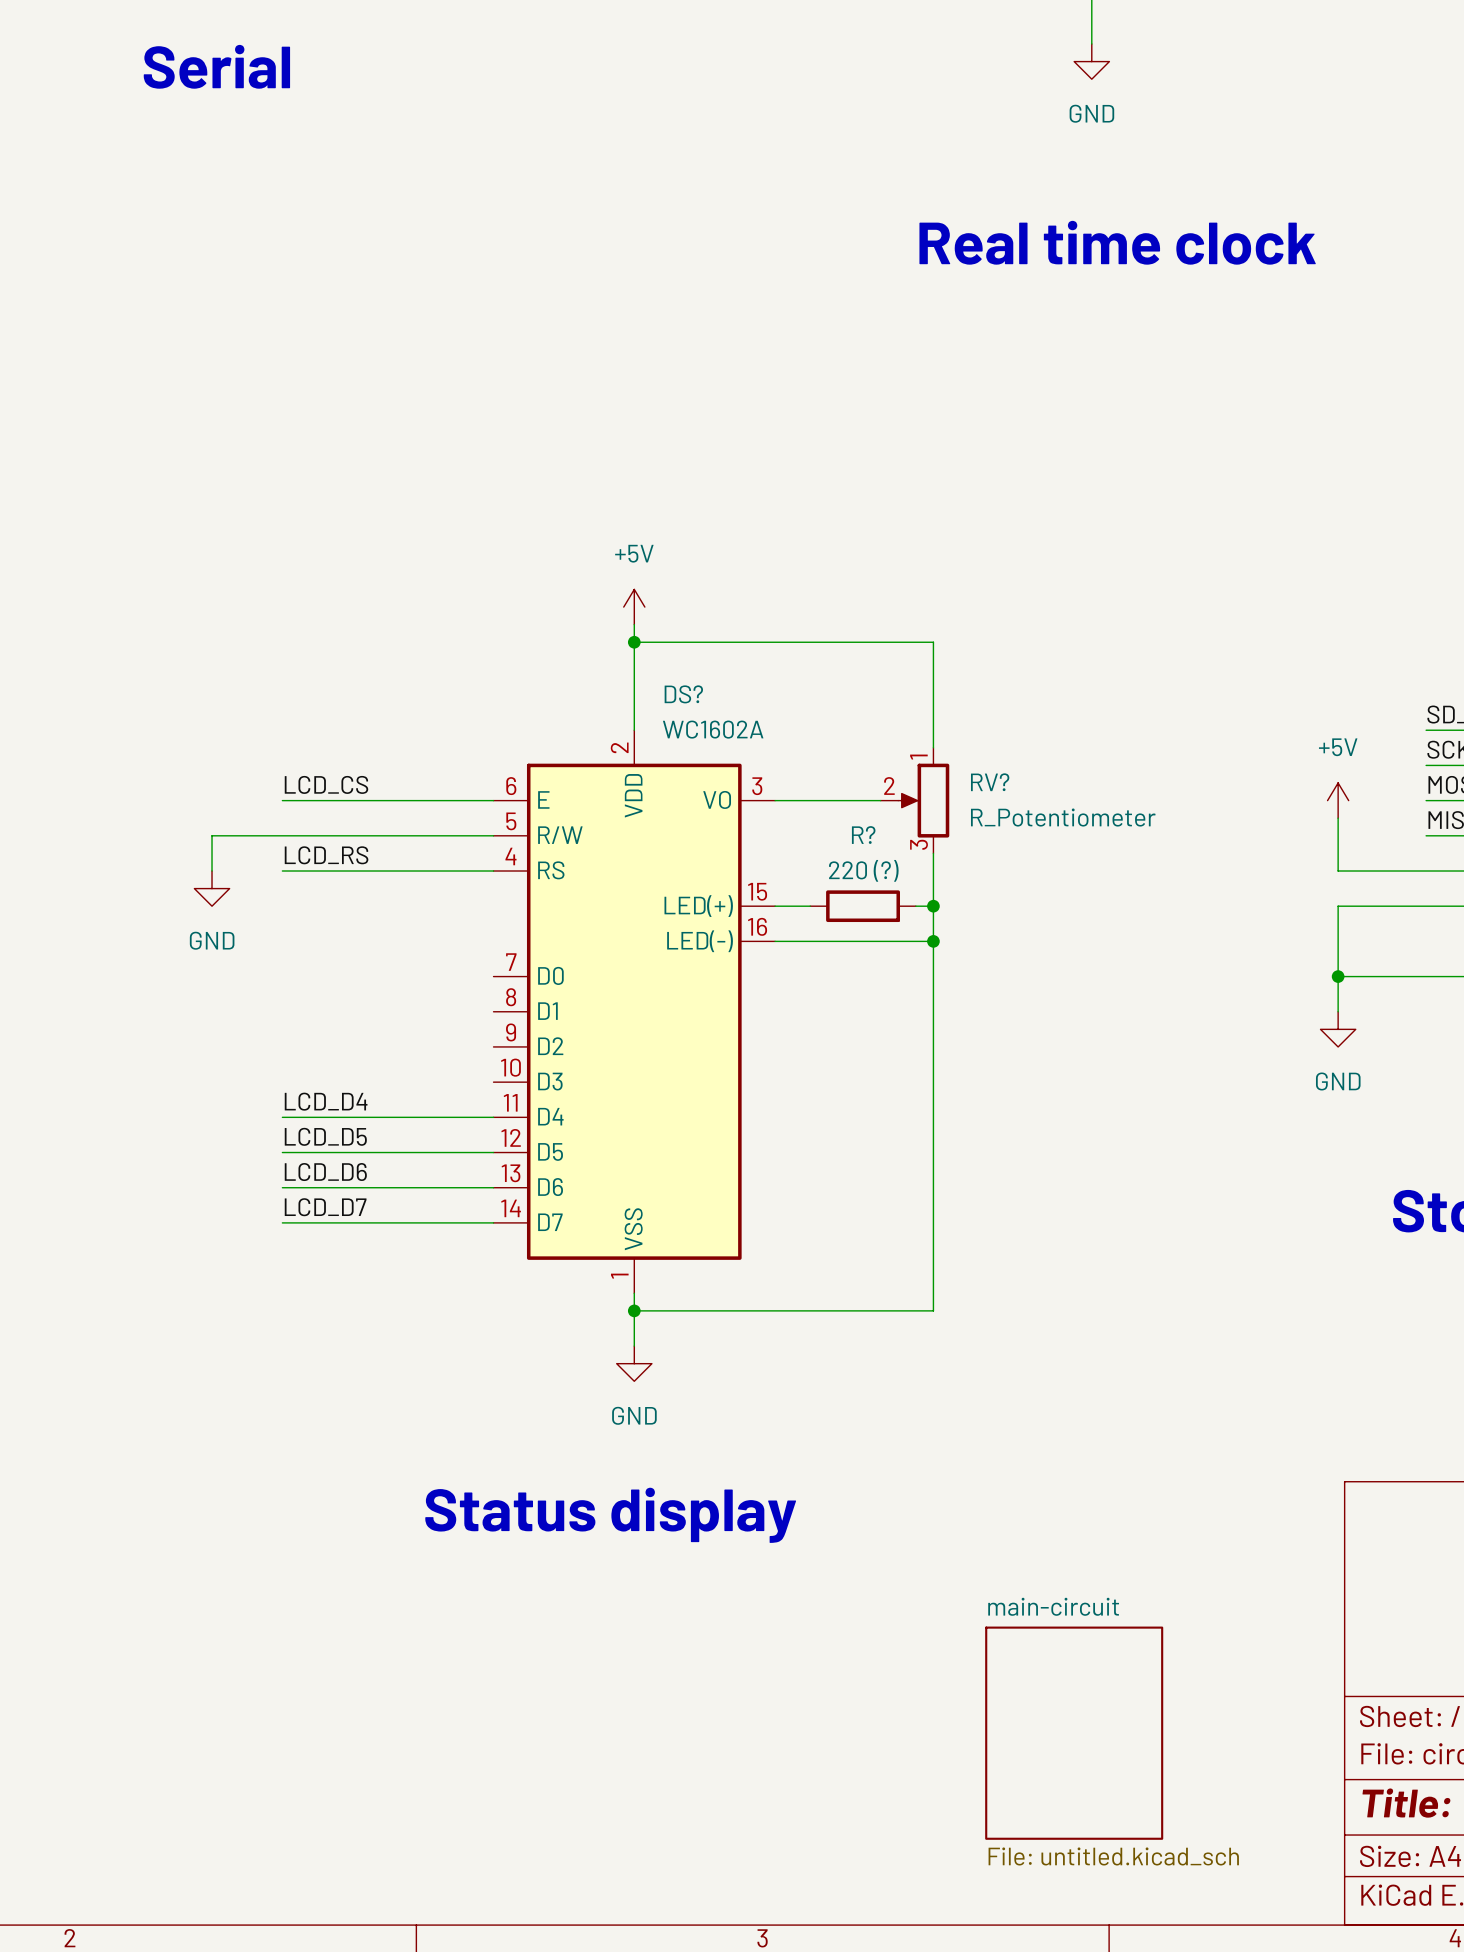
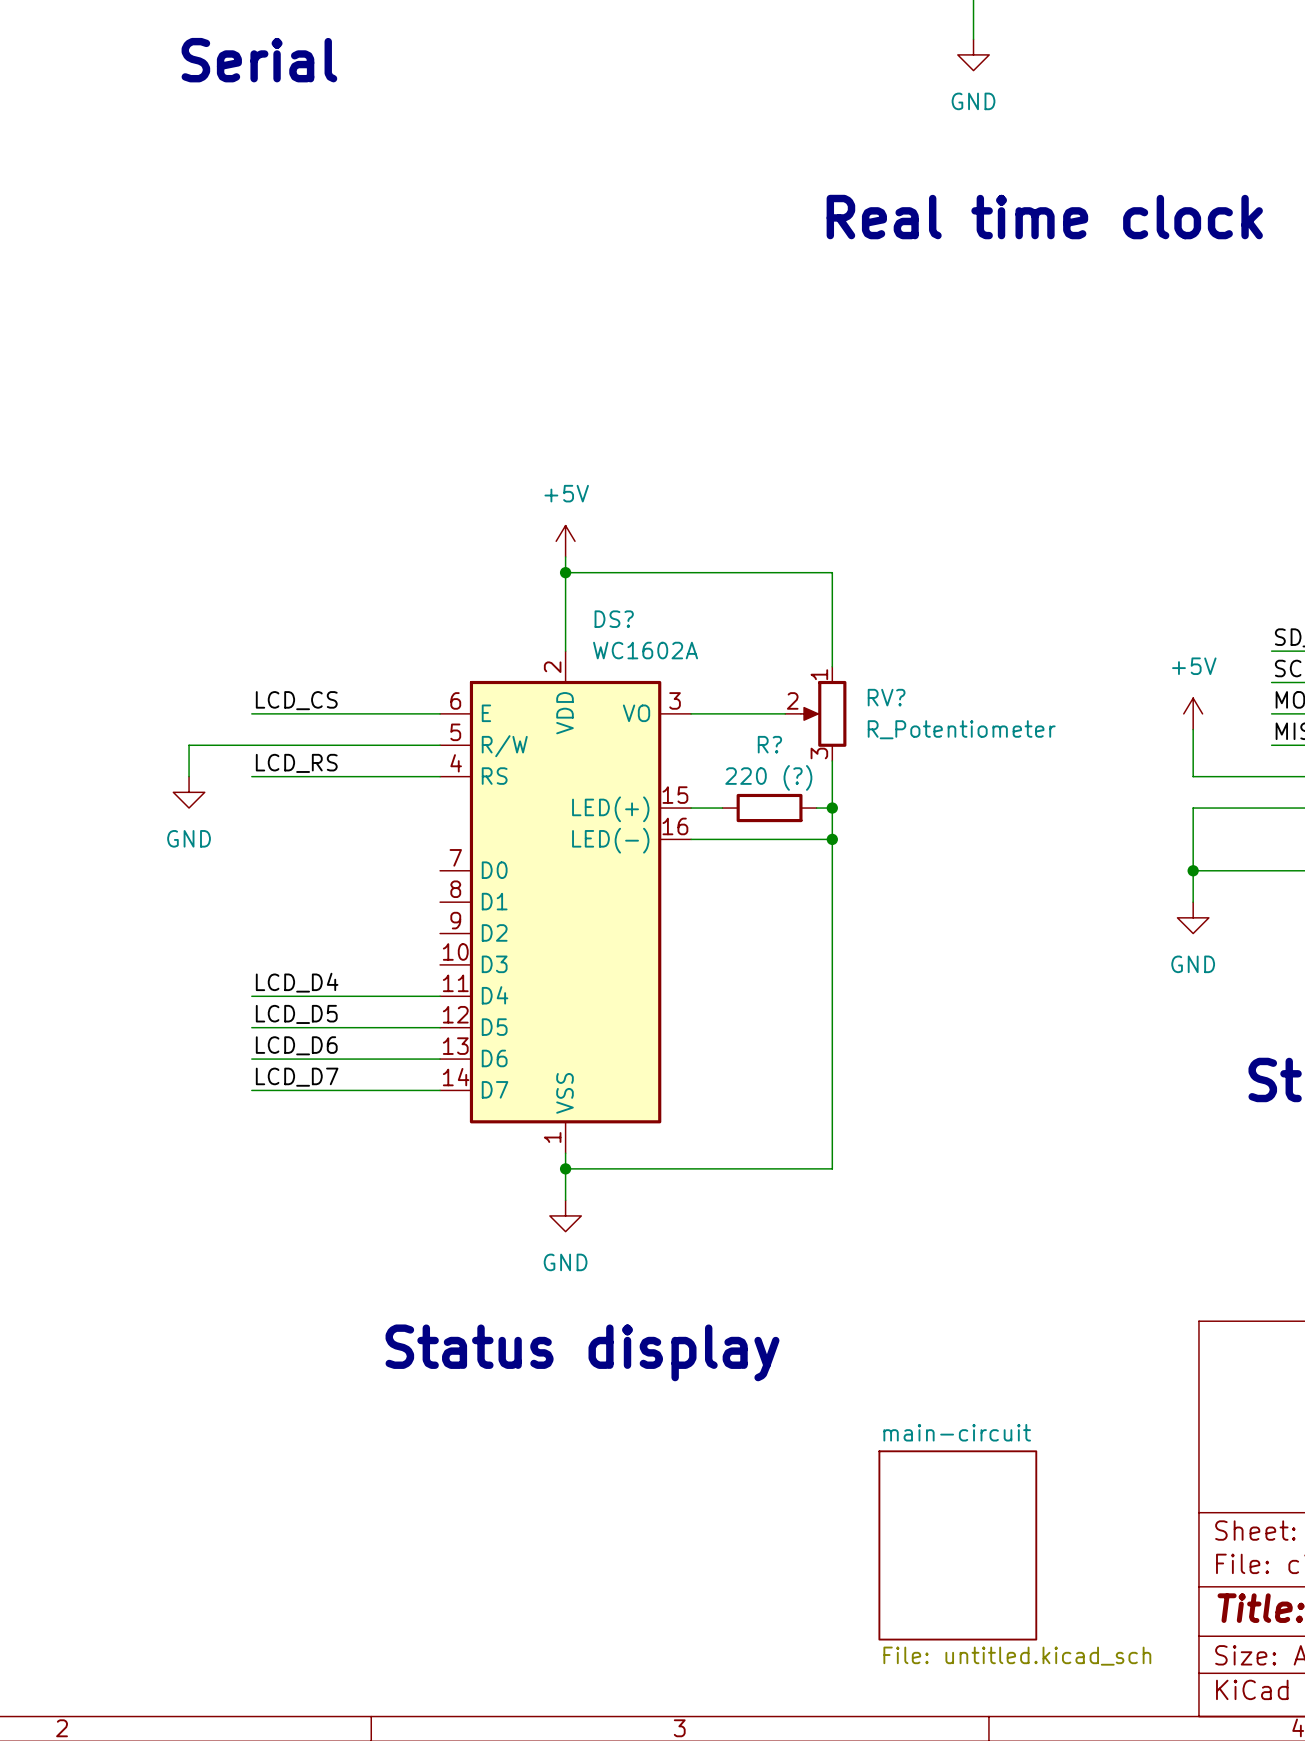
text position: Serial (216, 66) -> Serial (259, 60)

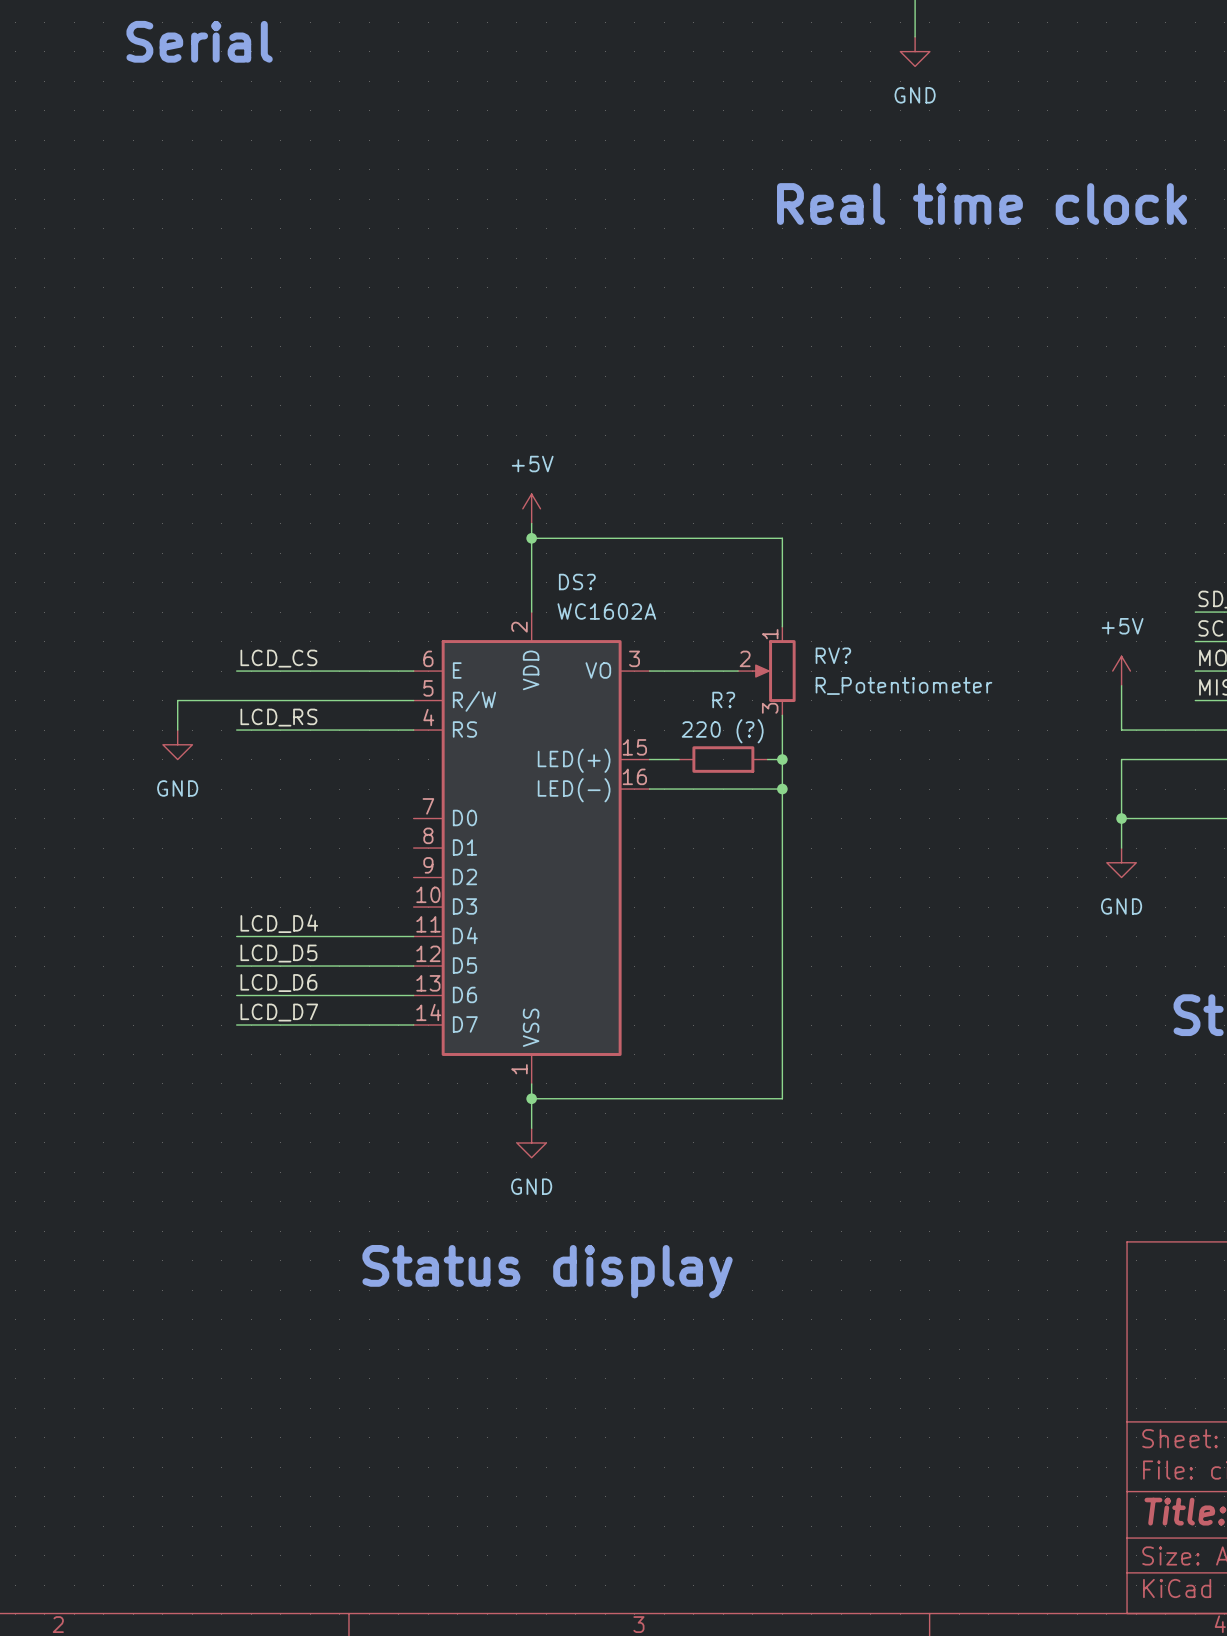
text position: Serial (259, 60) -> Serial (199, 41)
sheet main-circuit: File: untitled.kicad_sch (957, 1545) -> none

